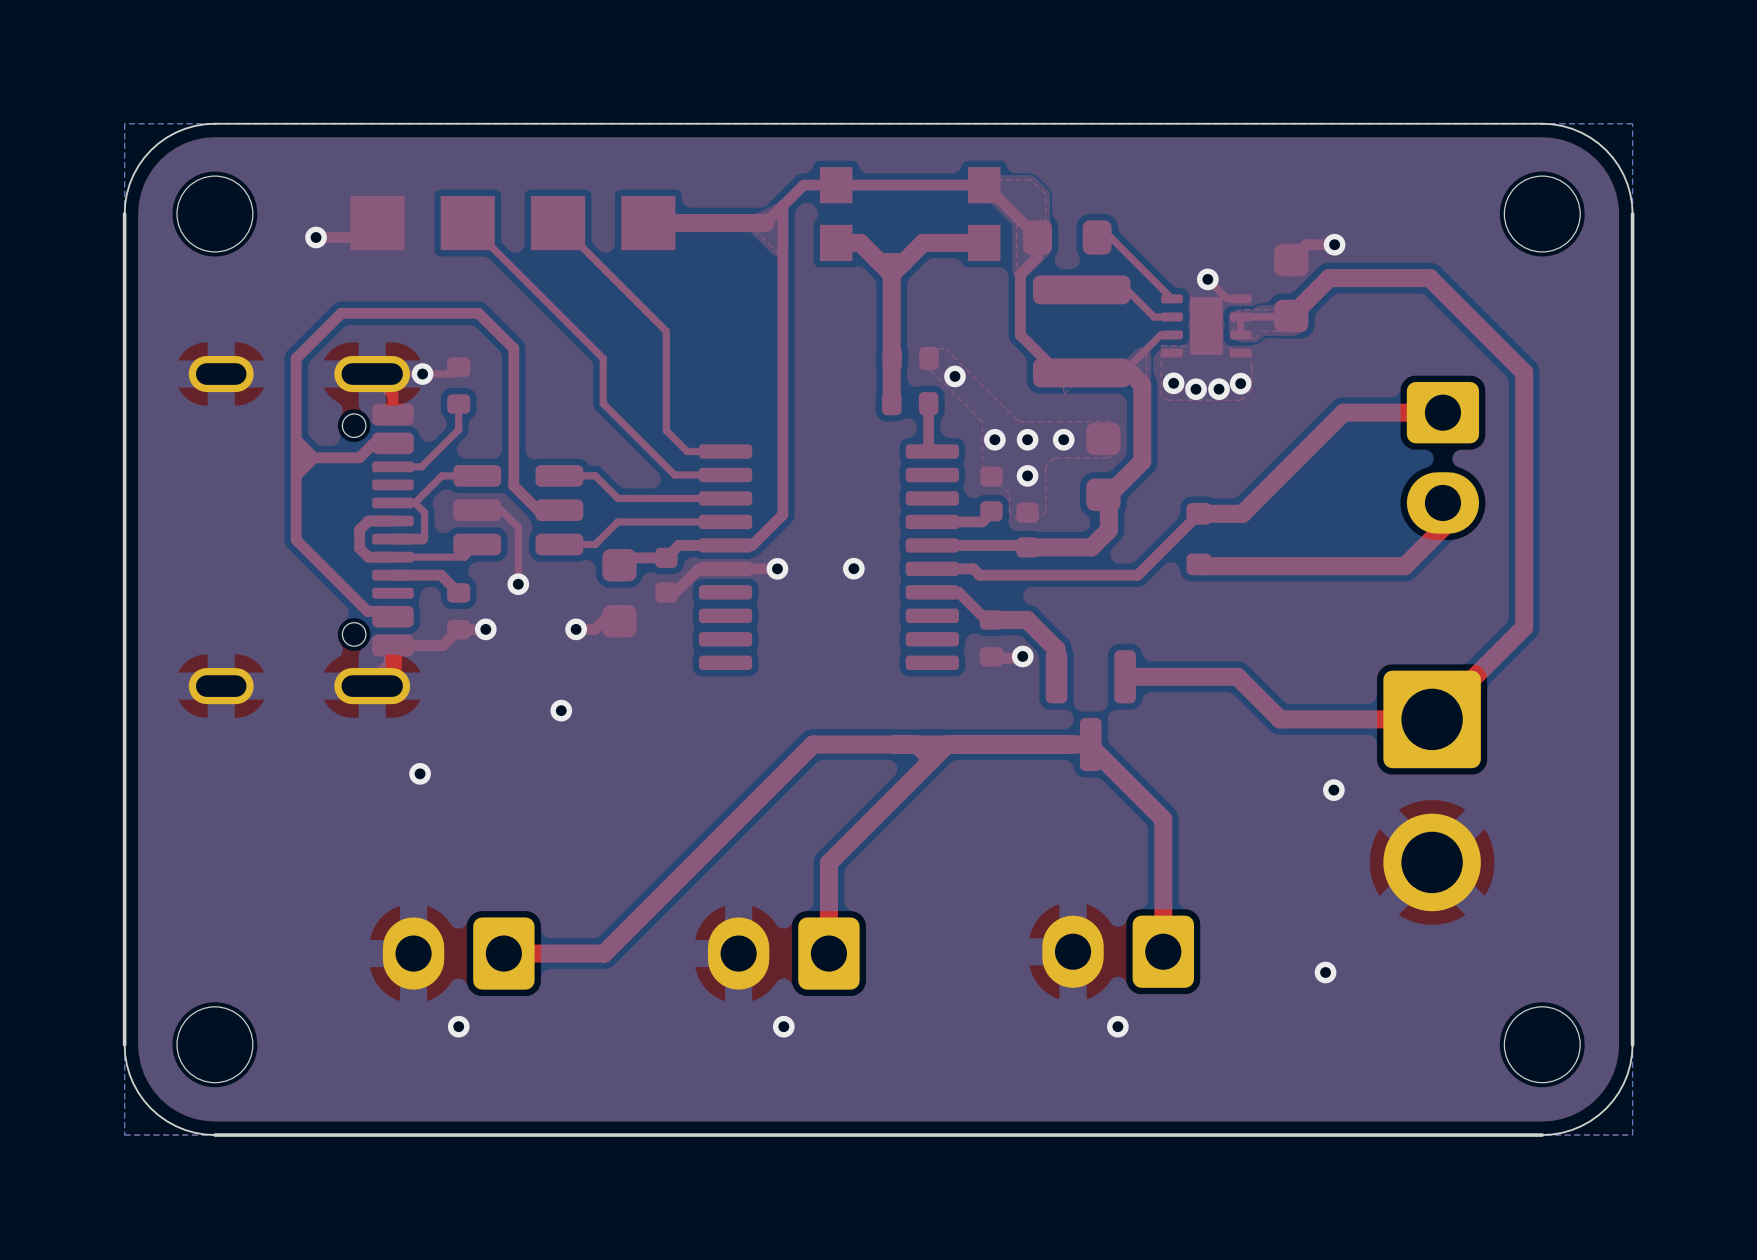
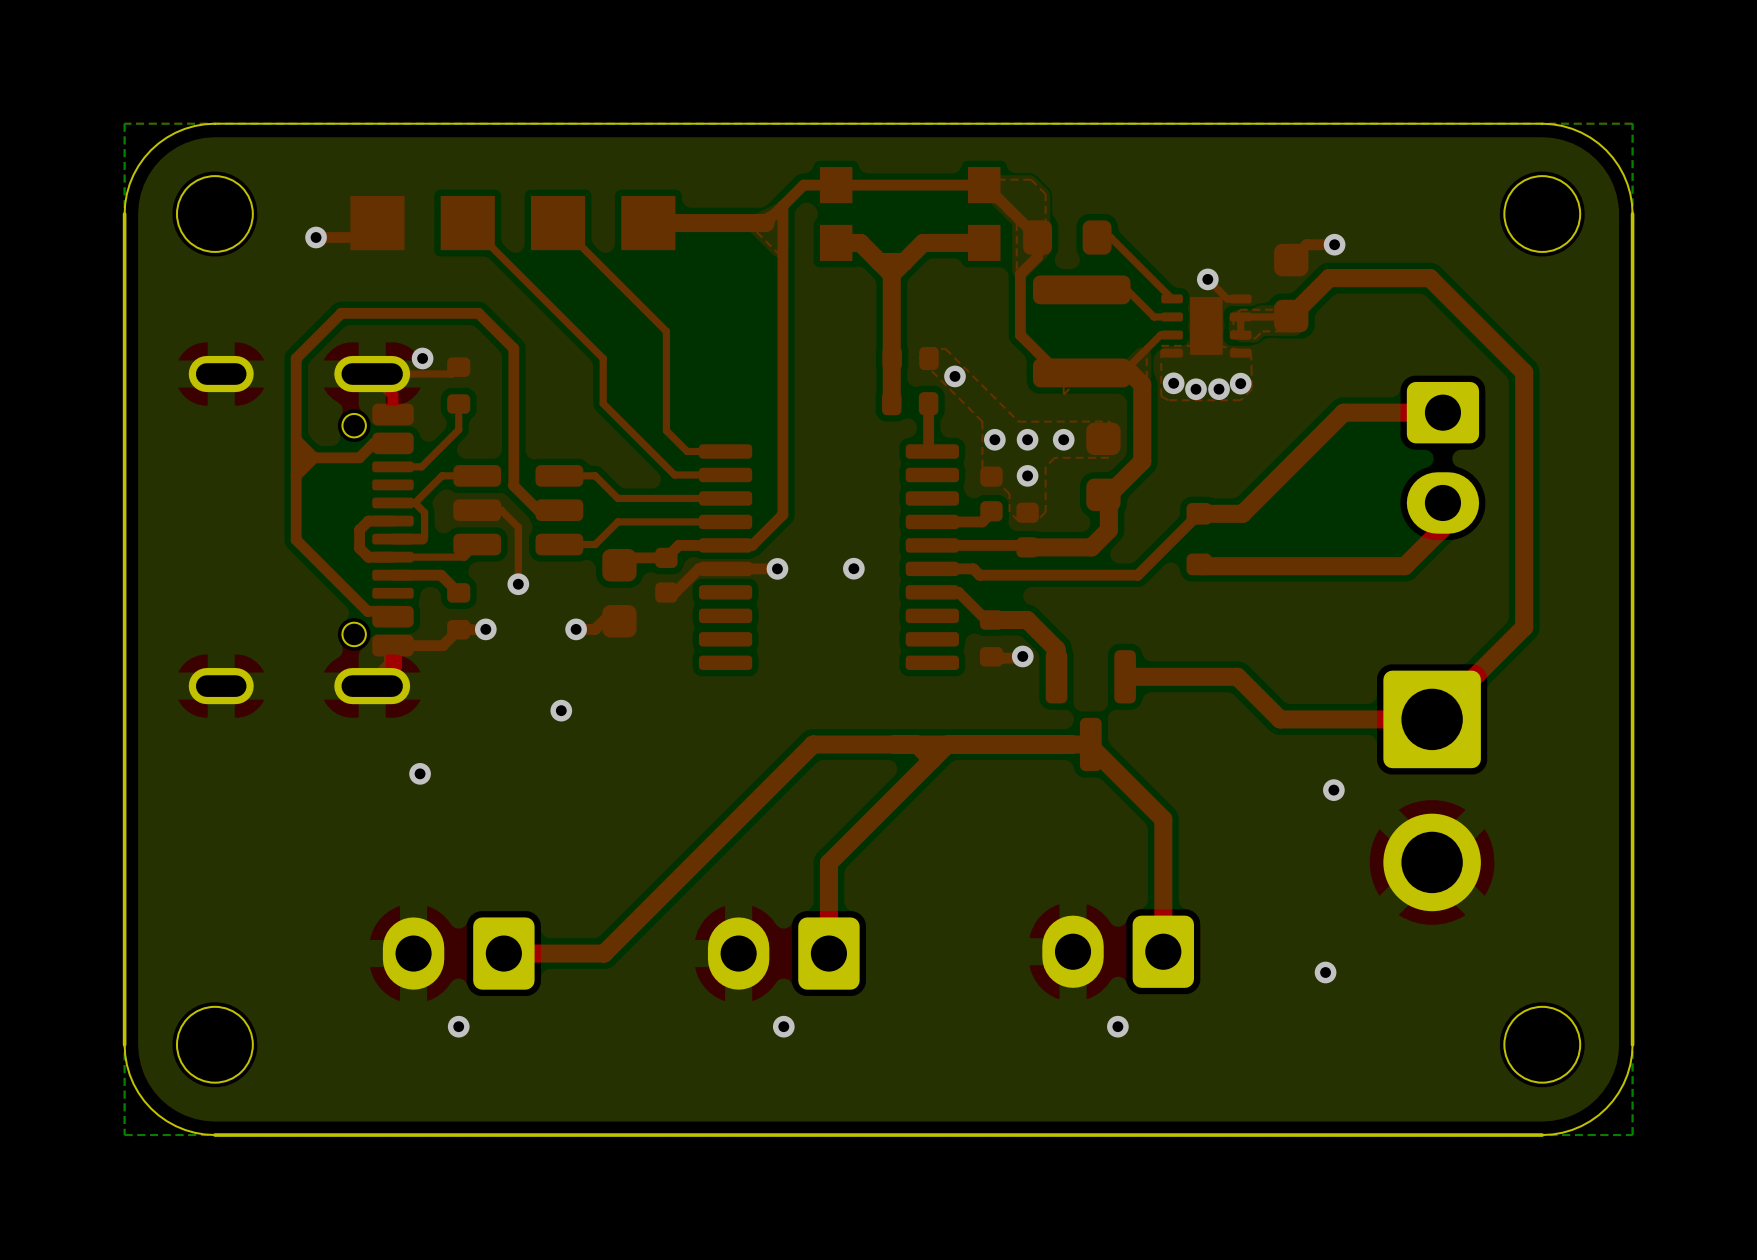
via position: (422, 374) -> (422, 358)

